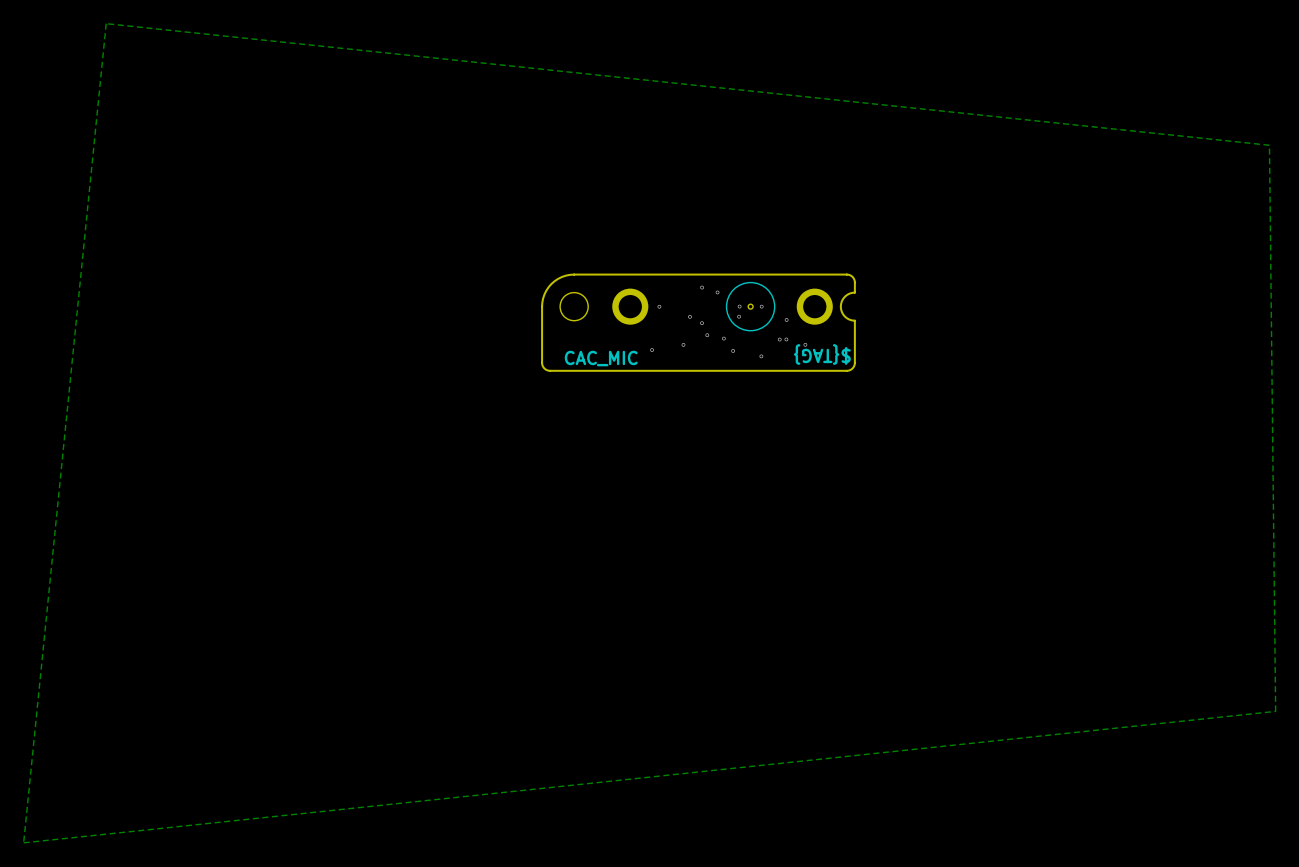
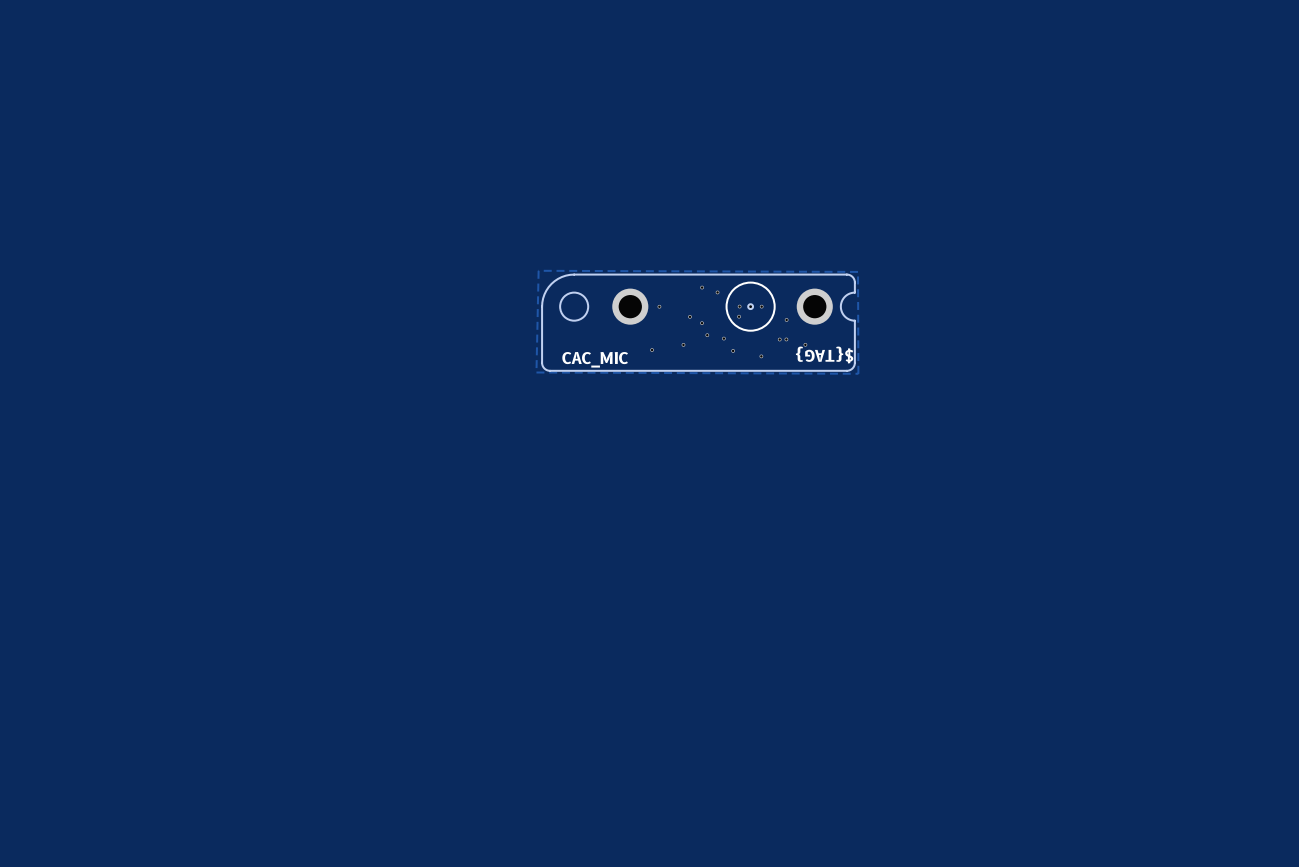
zone outline: (106, 23) (1269, 145) (1275, 711) (23, 842) (106, 23) -> none
zone outline: none -> (538, 270) (858, 271) (858, 373) (536, 372) (538, 270)

